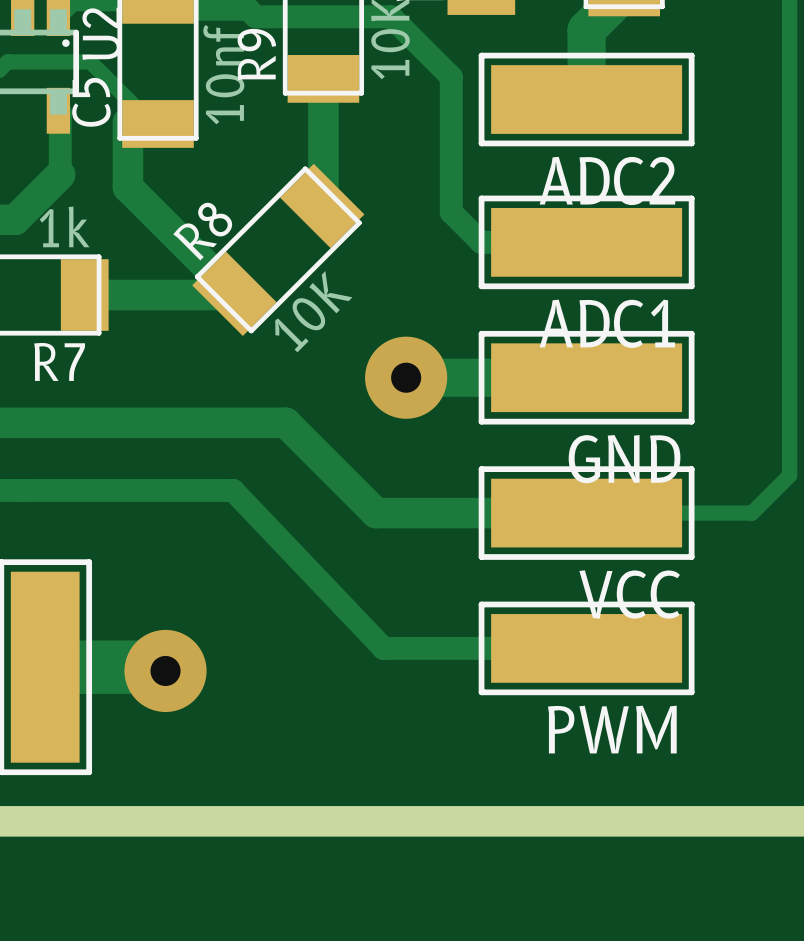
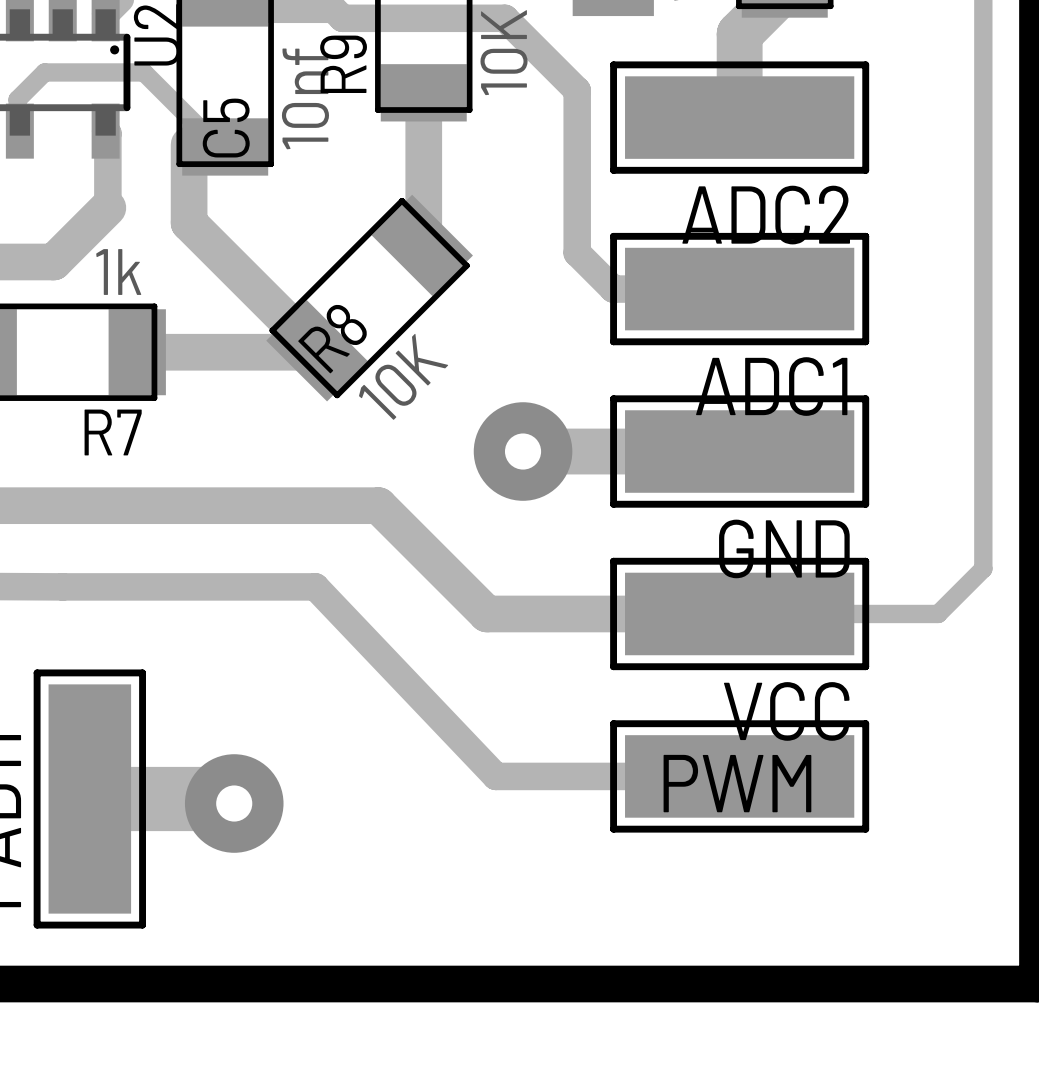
C5 name position: C5 (91, 102) -> C5 (226, 128)
R8 name position: R8 (202, 231) -> R8 (332, 339)
PWM name position: PWM (612, 729) -> PWM (737, 783)

